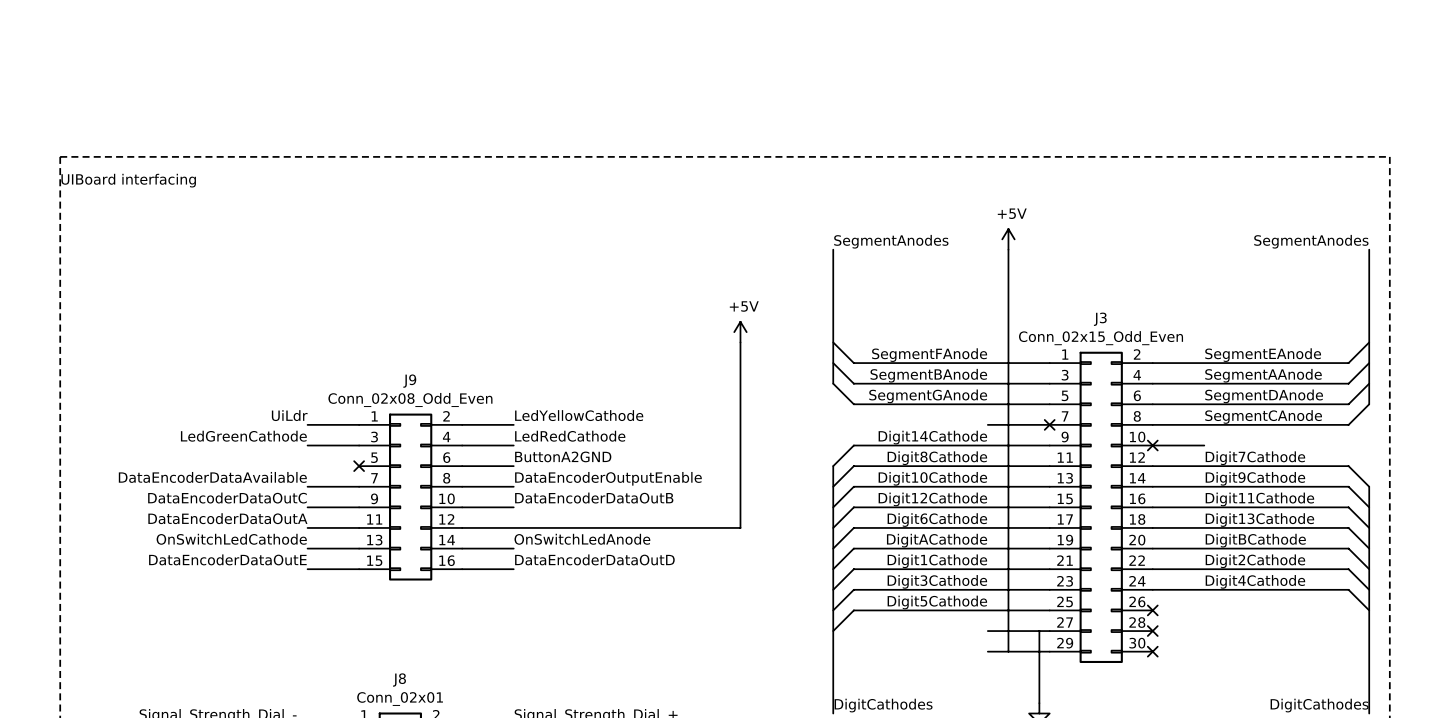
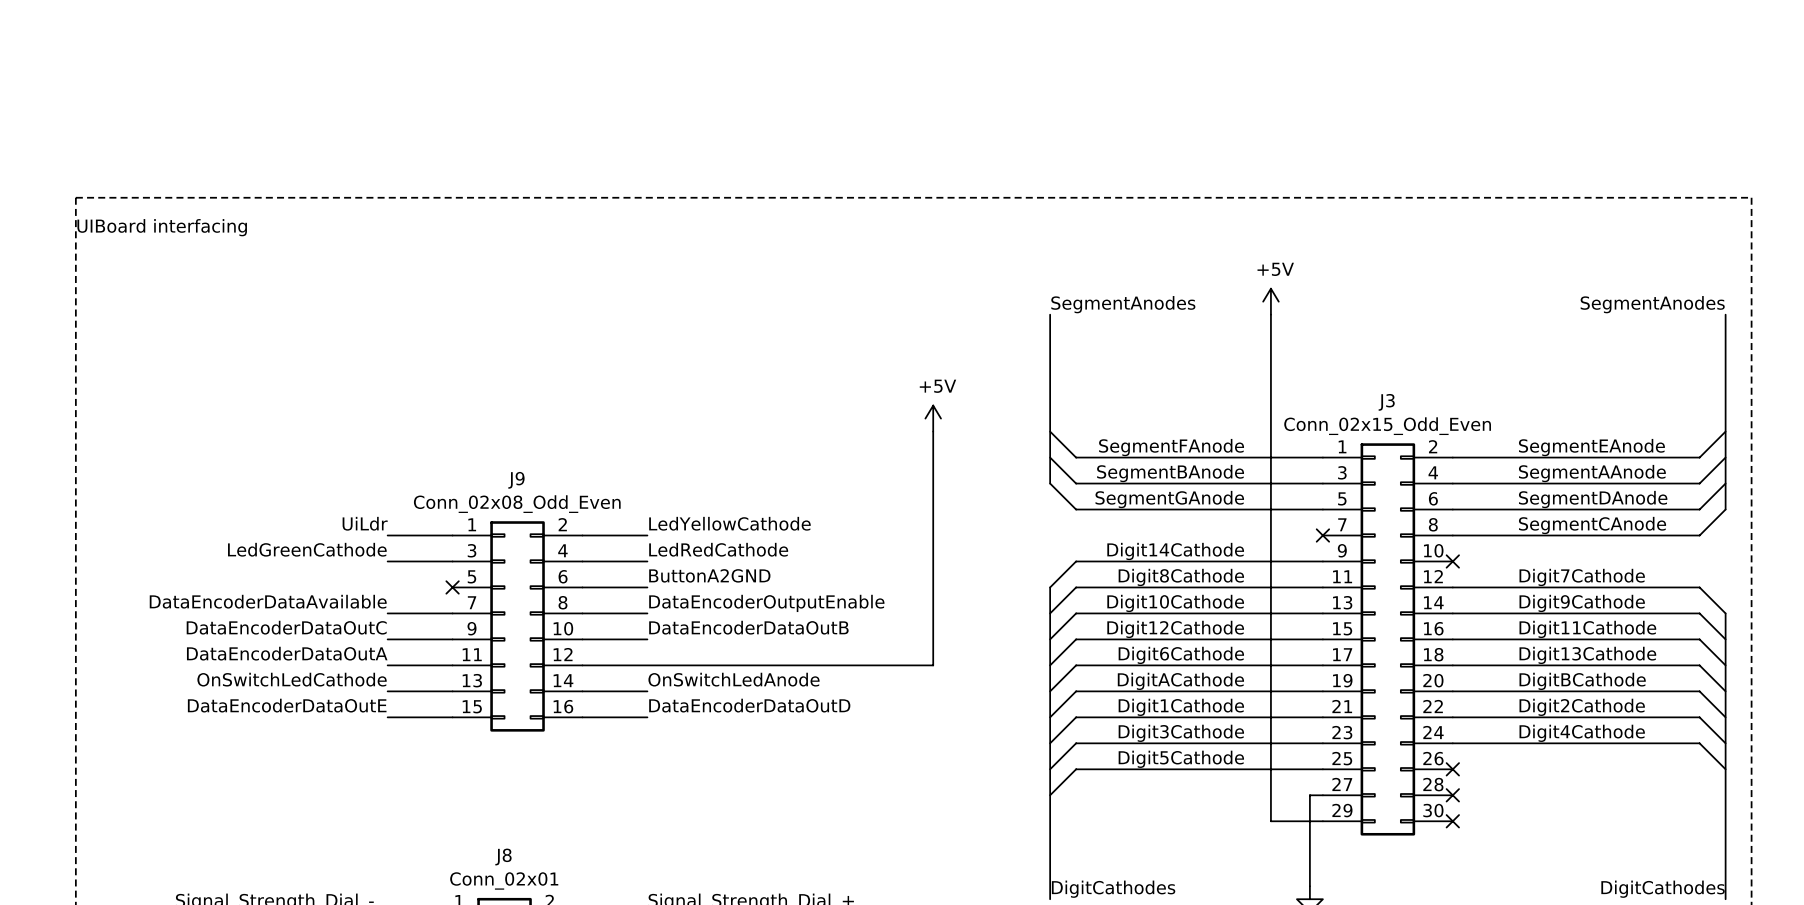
wire: (987, 424) (1049, 424) -> none
wire: (1152, 445) (1204, 445) -> none
wire: (987, 631) (1039, 631) -> none
wire: (987, 651) (1008, 651) -> none

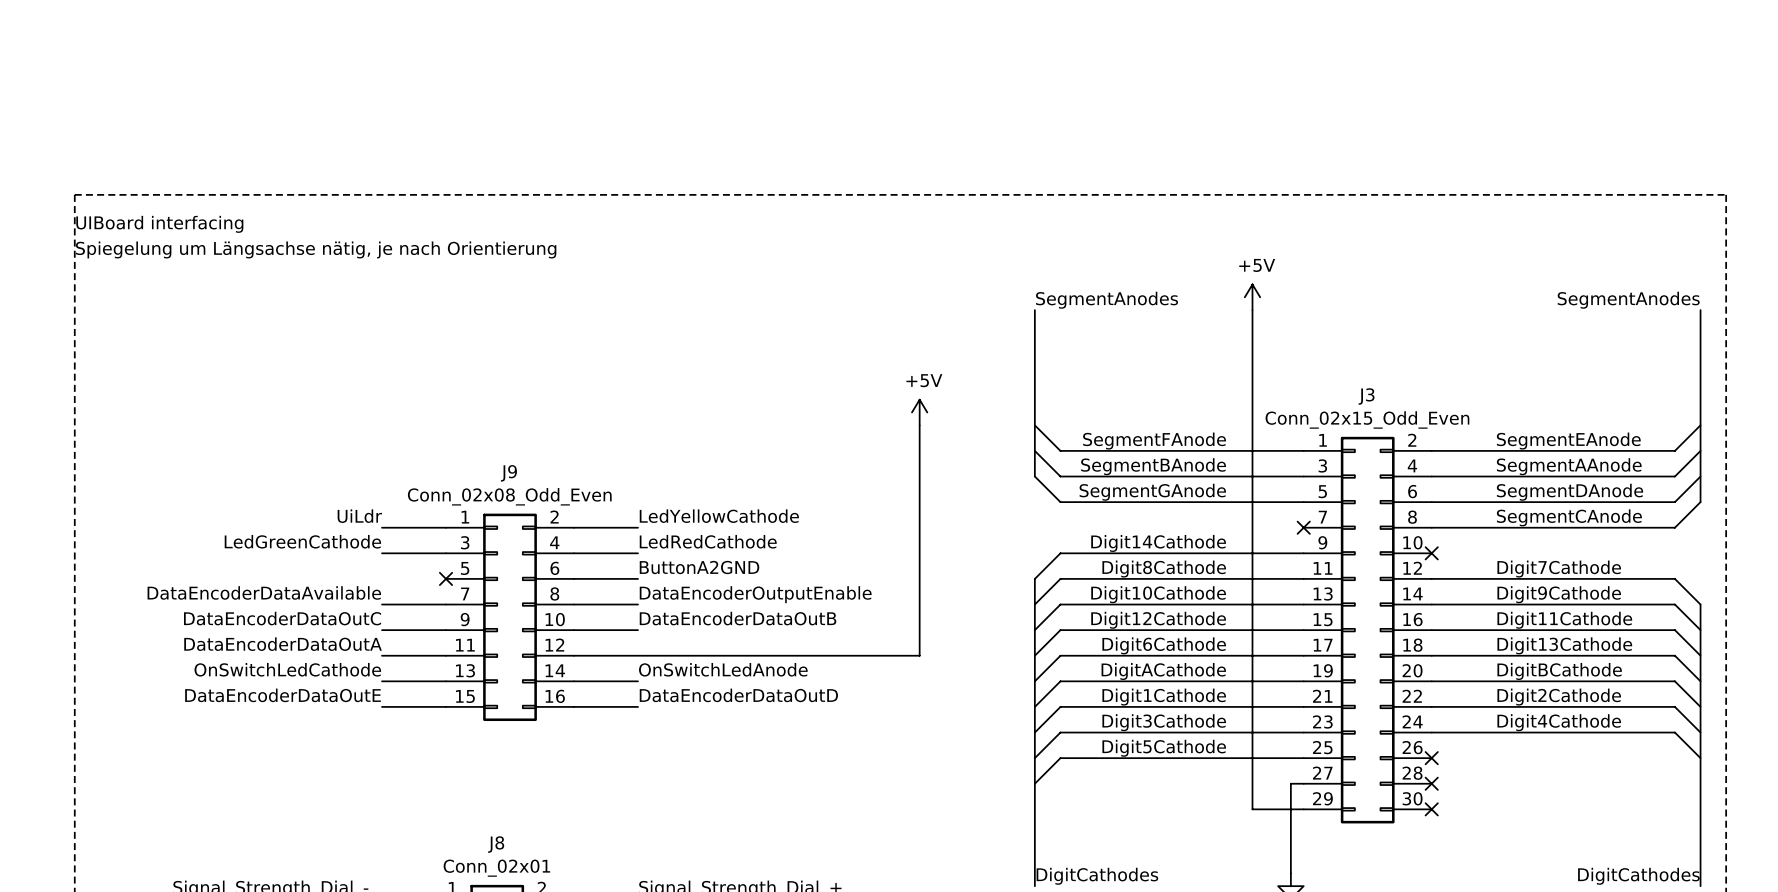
text: none -> Spiegelung um Längsachse nätig, je nach Orientierung (316, 249)

